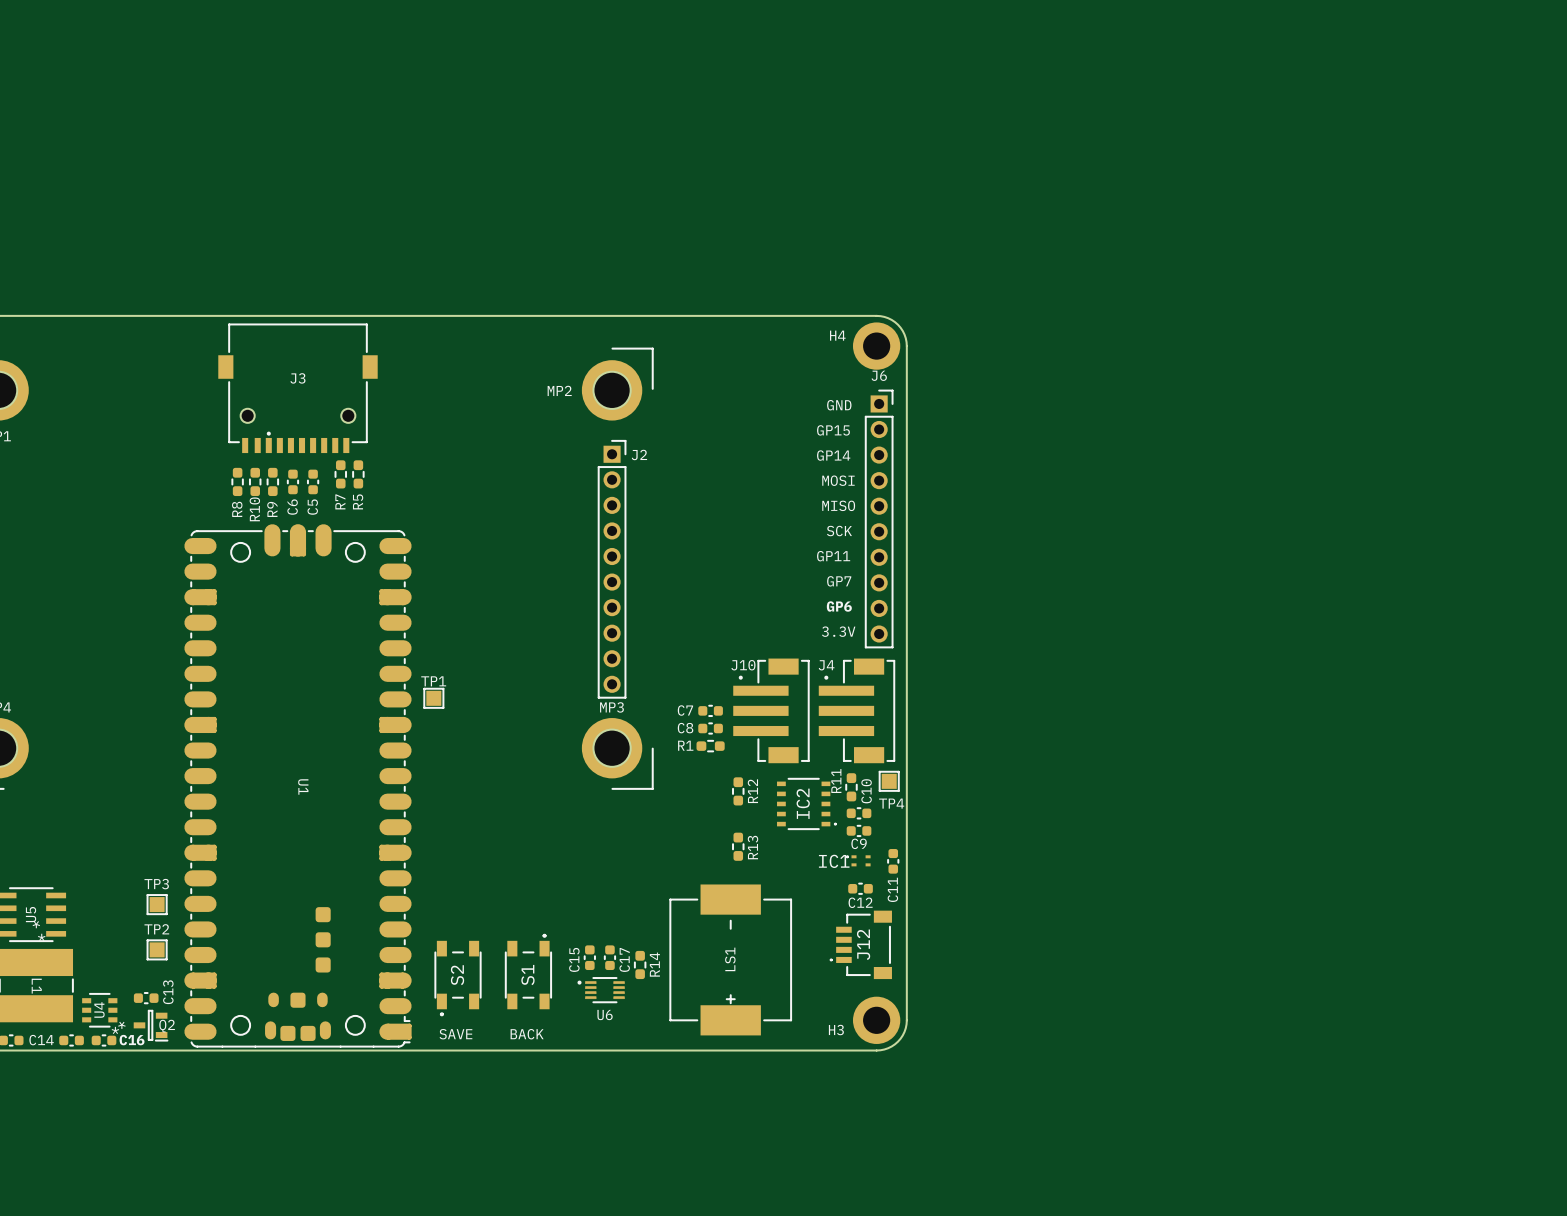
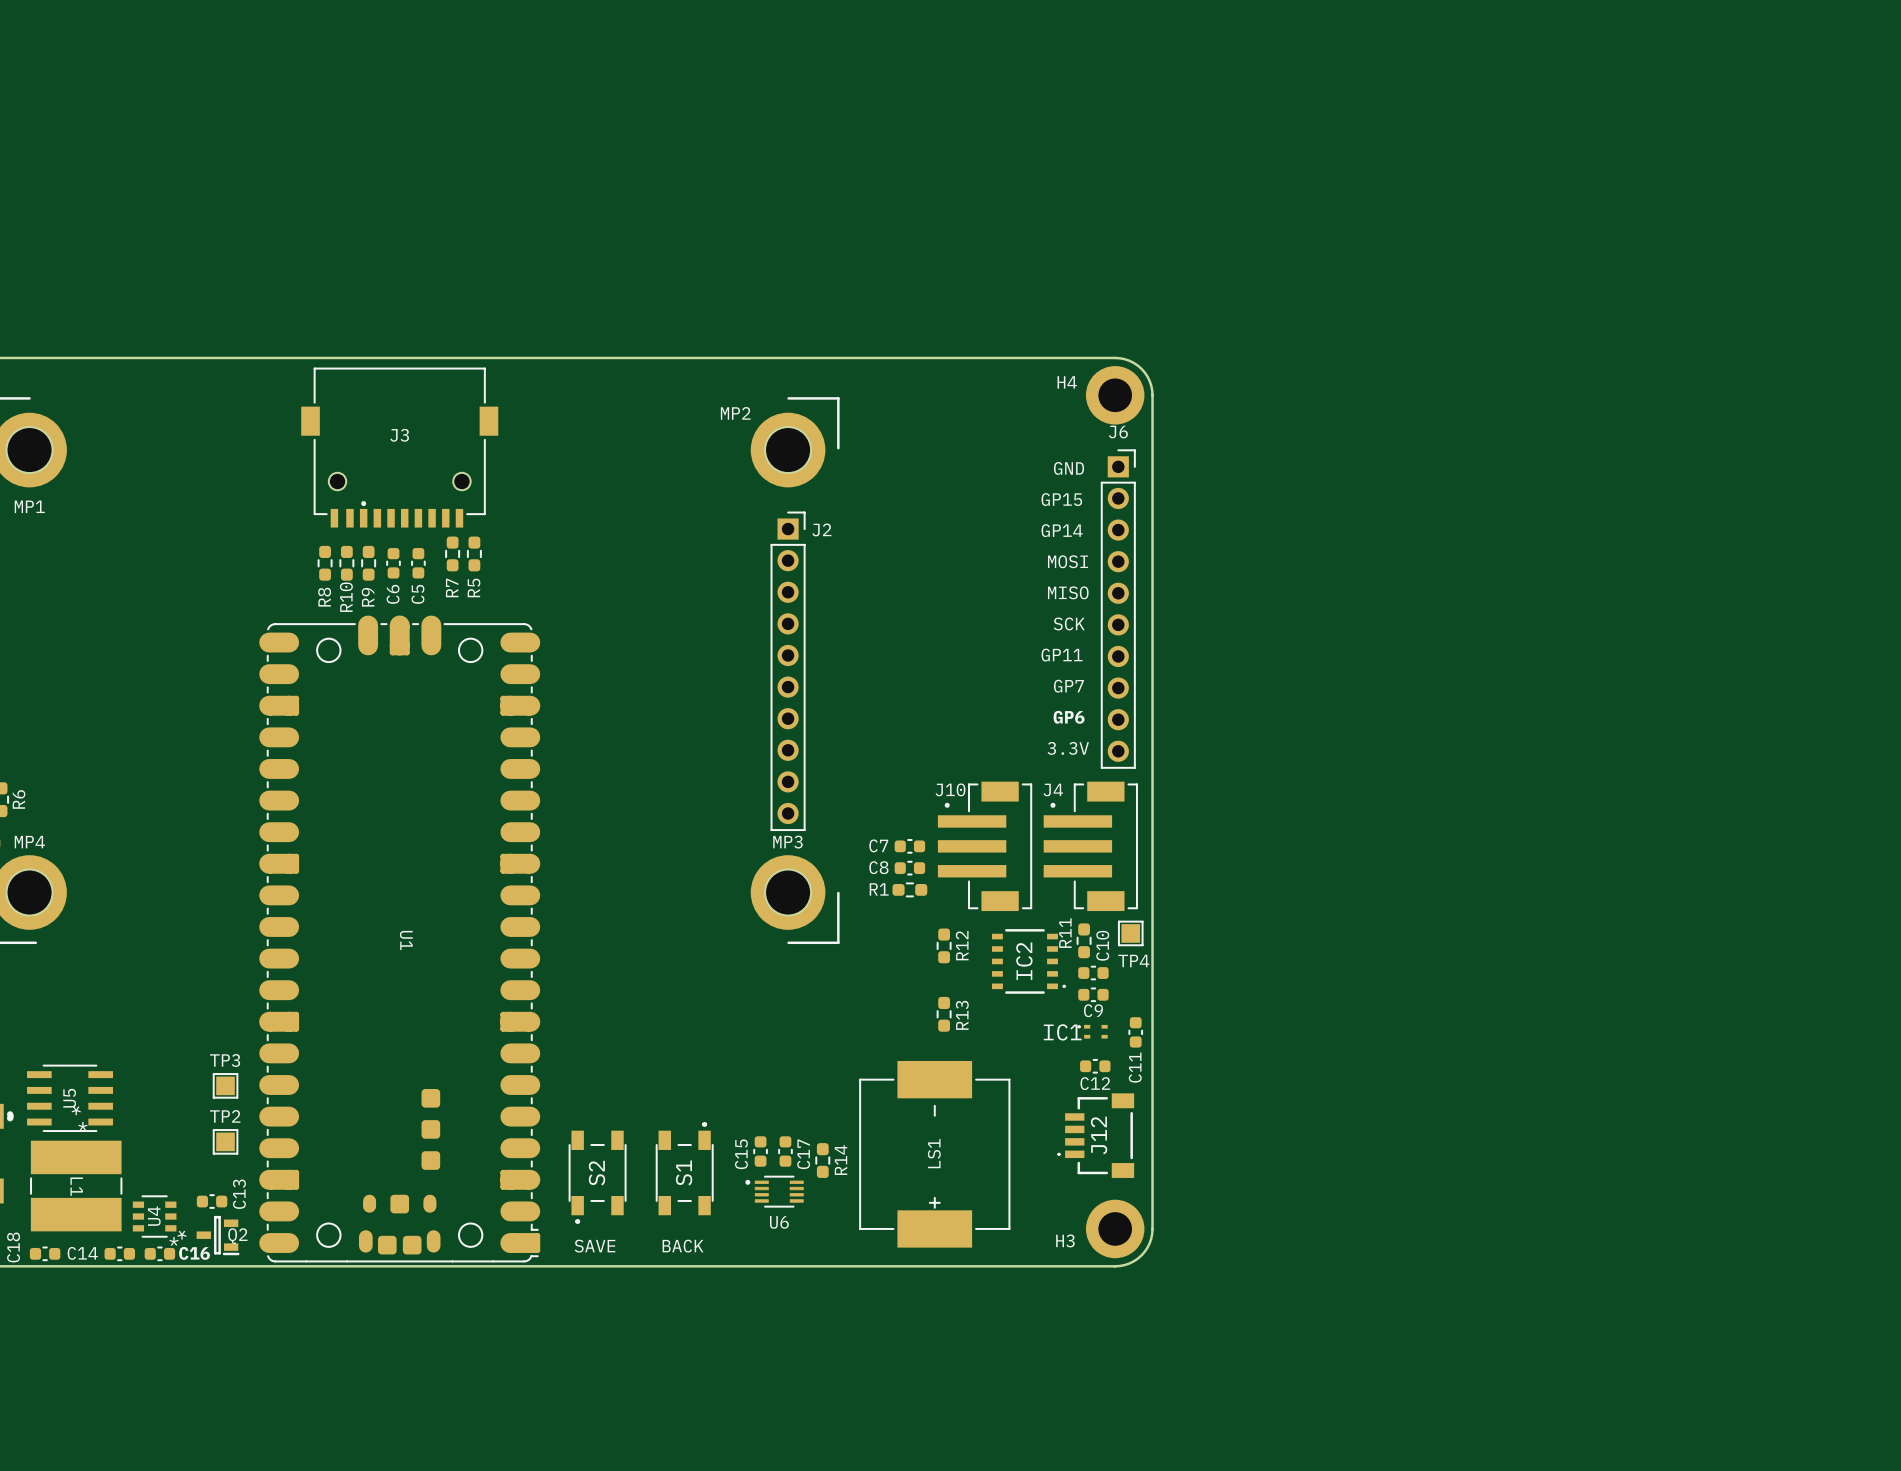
MP2 name position: MP2 (559, 390) -> MP2 (735, 413)
TP1: (433, 698) -> none

